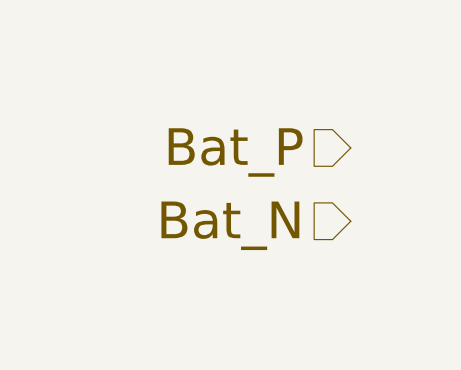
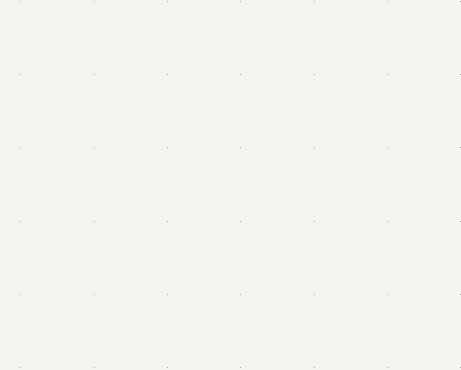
hierarchical label: Bat_P (235, 152) -> none
hierarchical label: Bat_N (230, 225) -> none

